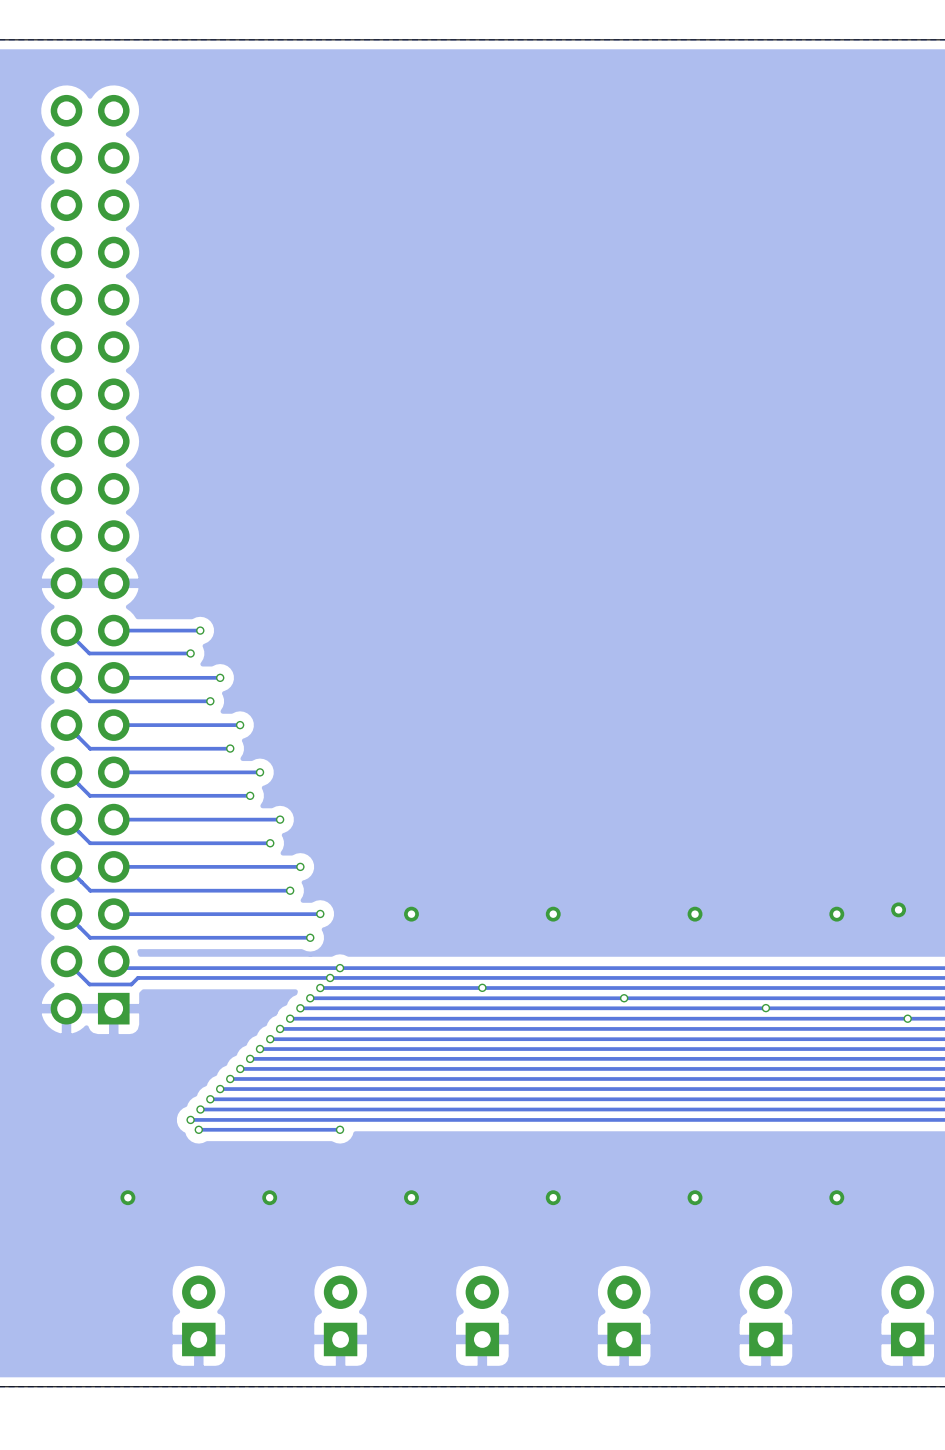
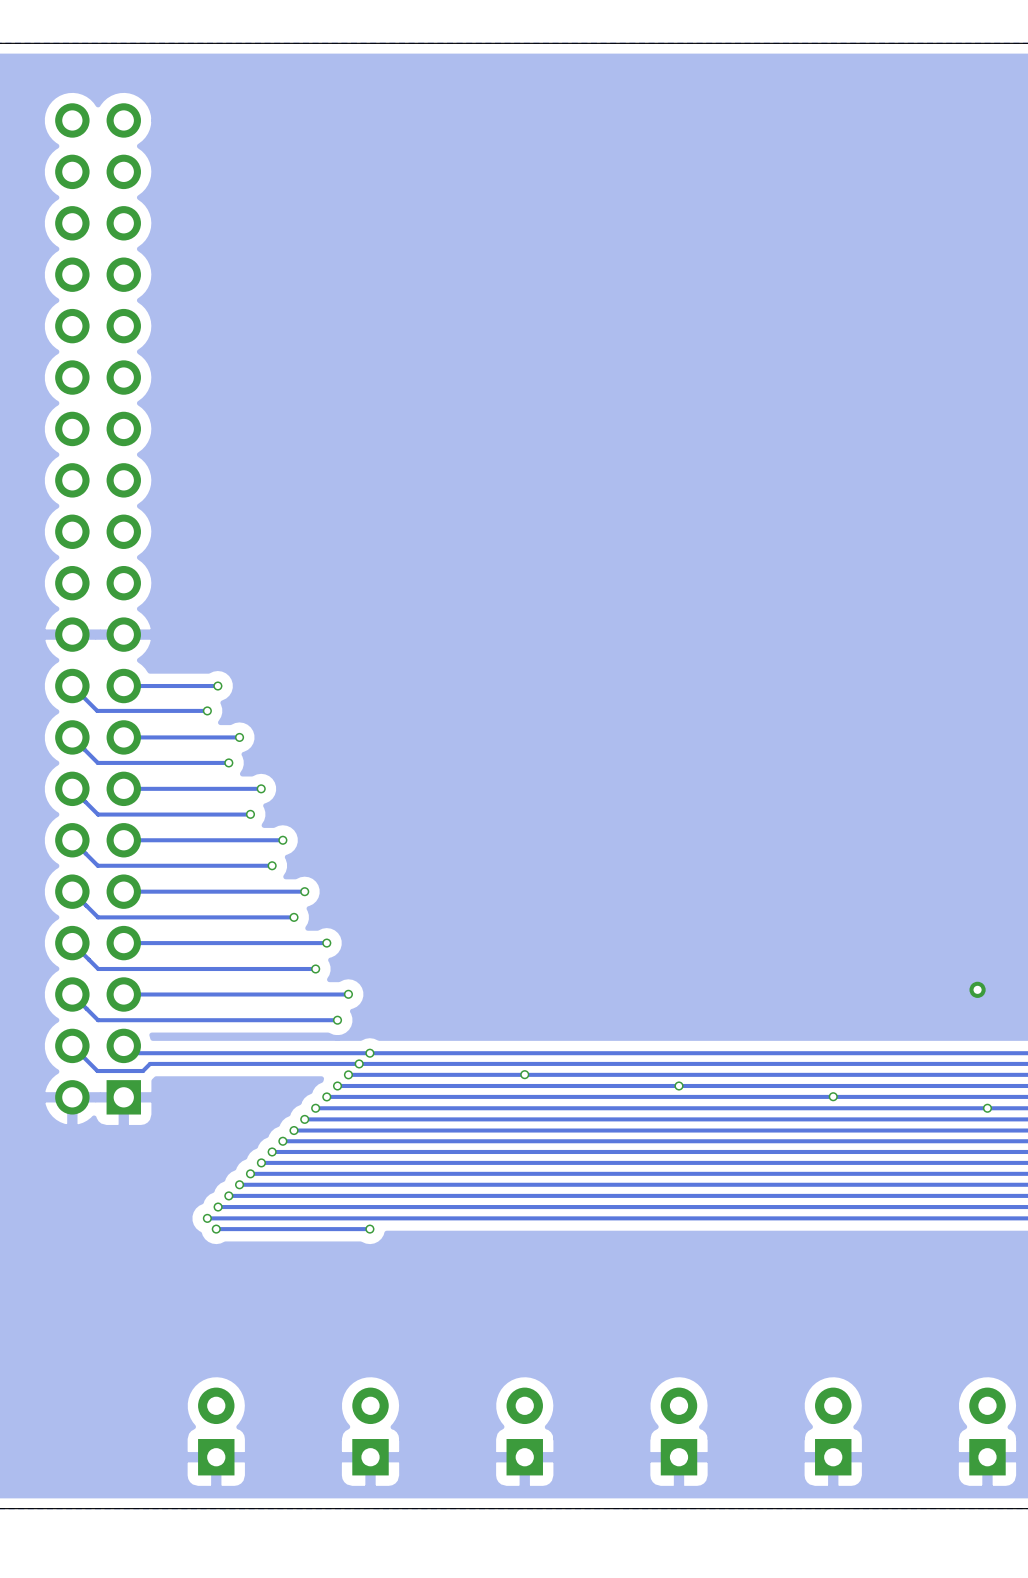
via: (411, 914) -> none
via: (553, 914) -> none
via: (695, 914) -> none
via: (836, 914) -> none
via: (127, 1197) -> none
via: (269, 1197) -> none
via: (411, 1197) -> none
via: (553, 1197) -> none
via: (695, 1197) -> none
via: (836, 1197) -> none

